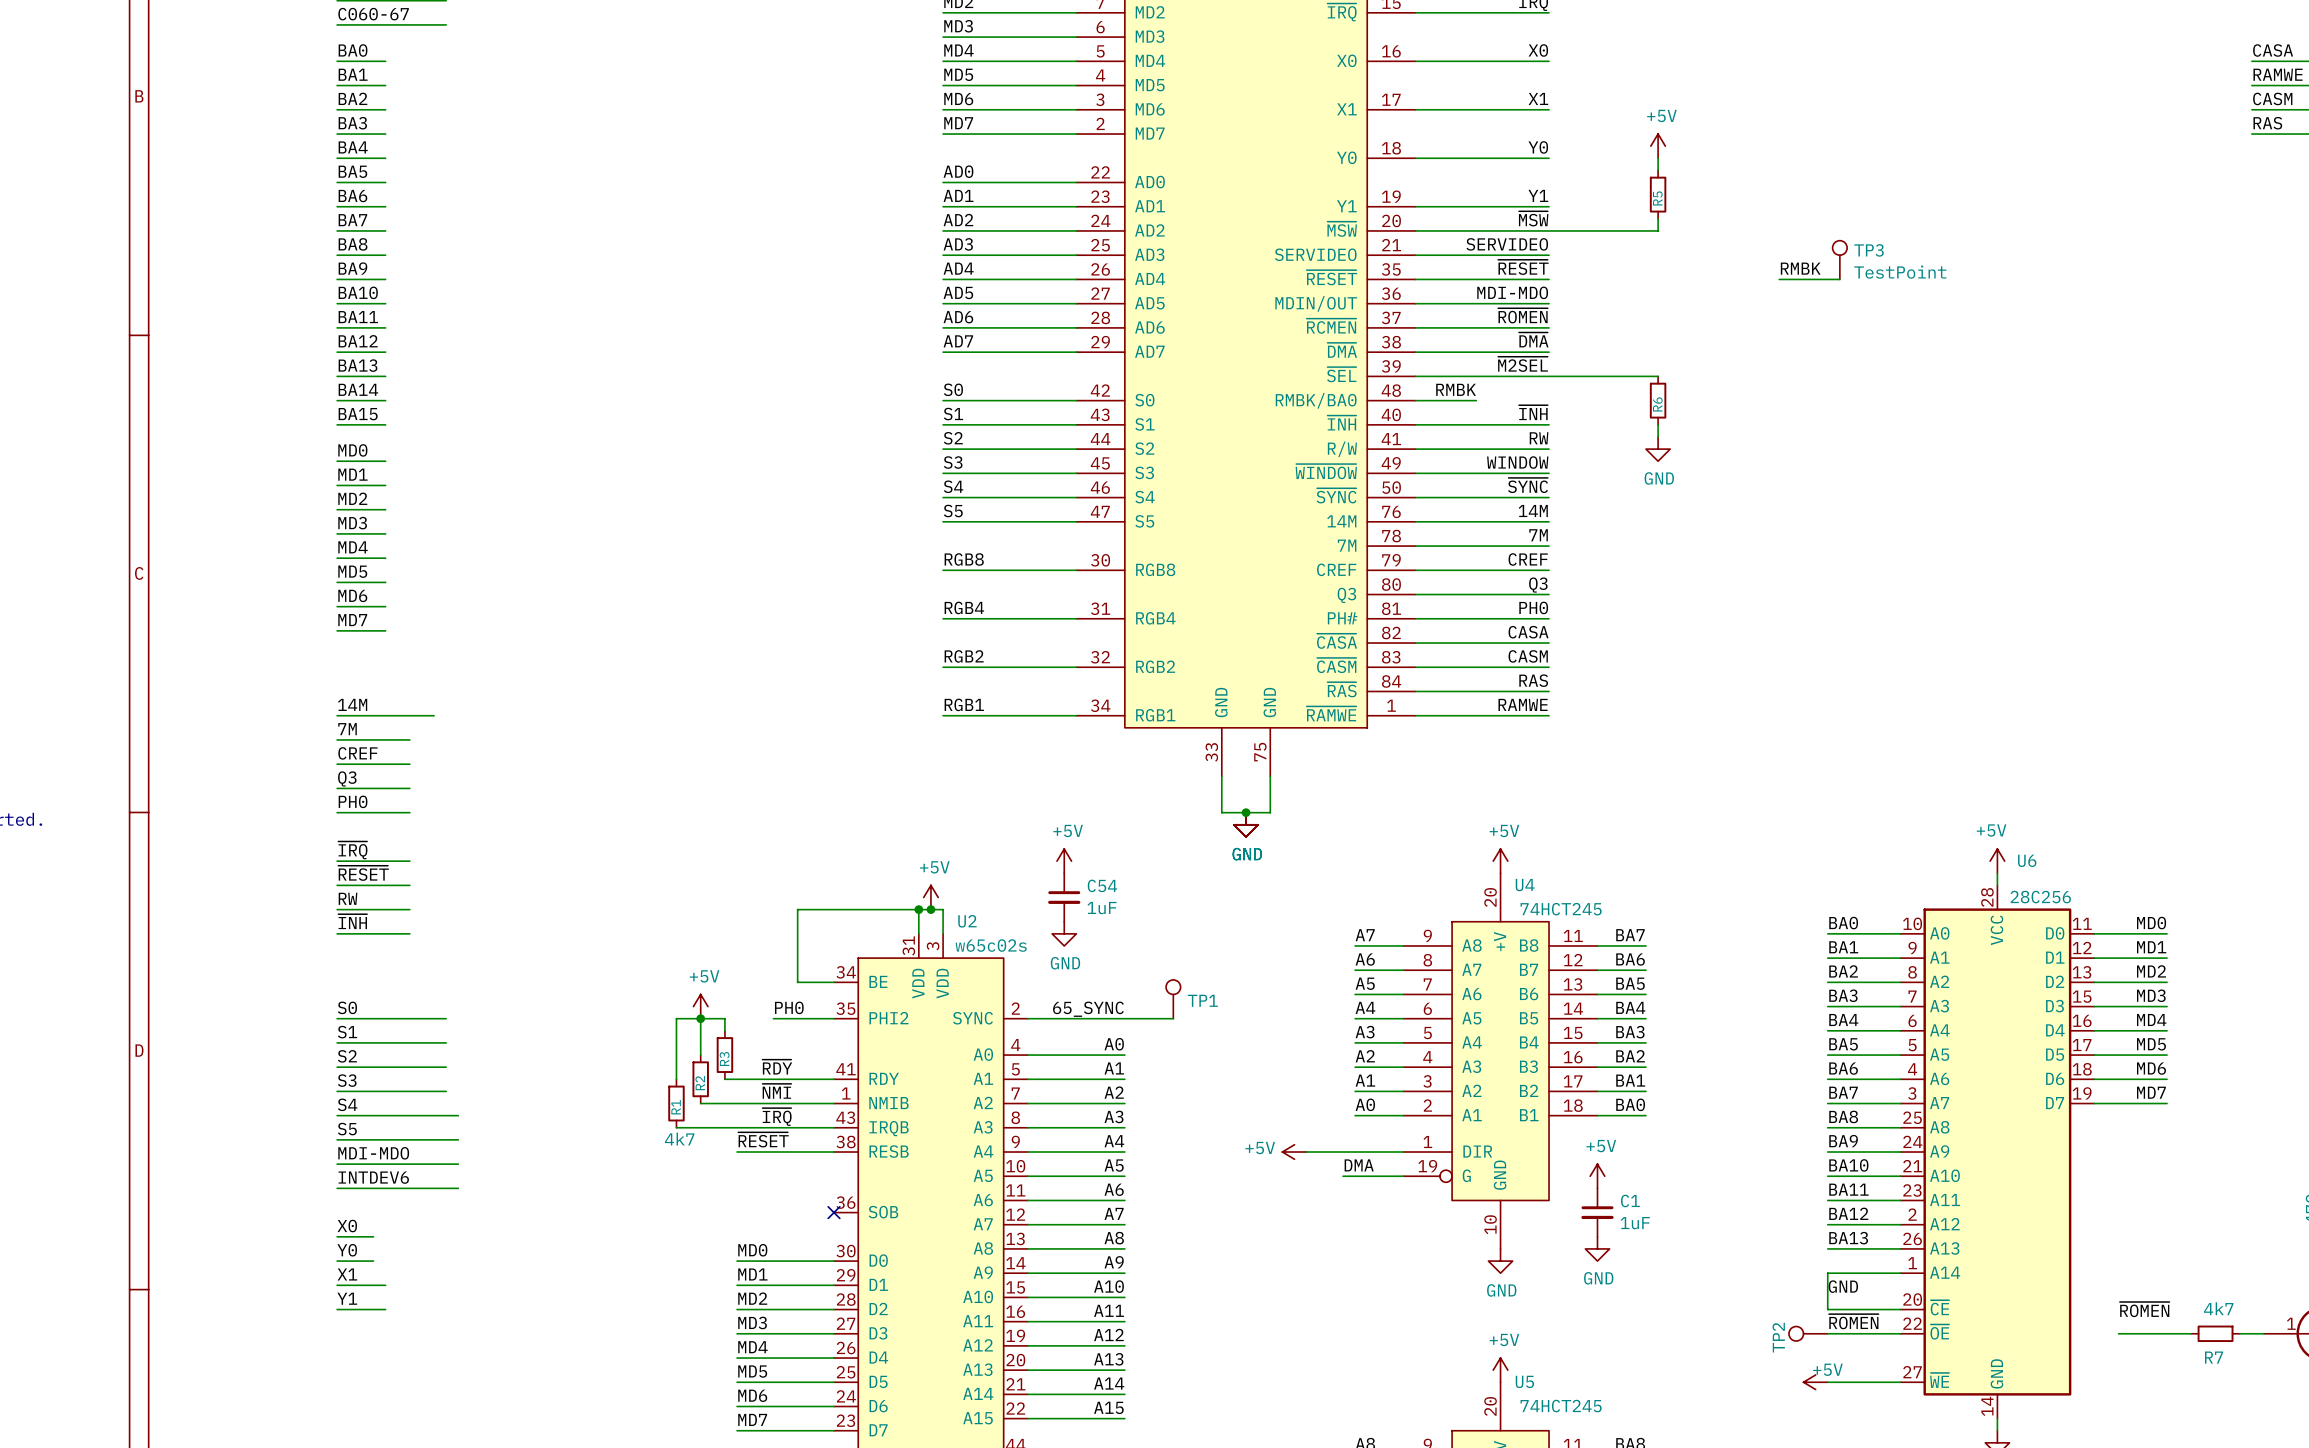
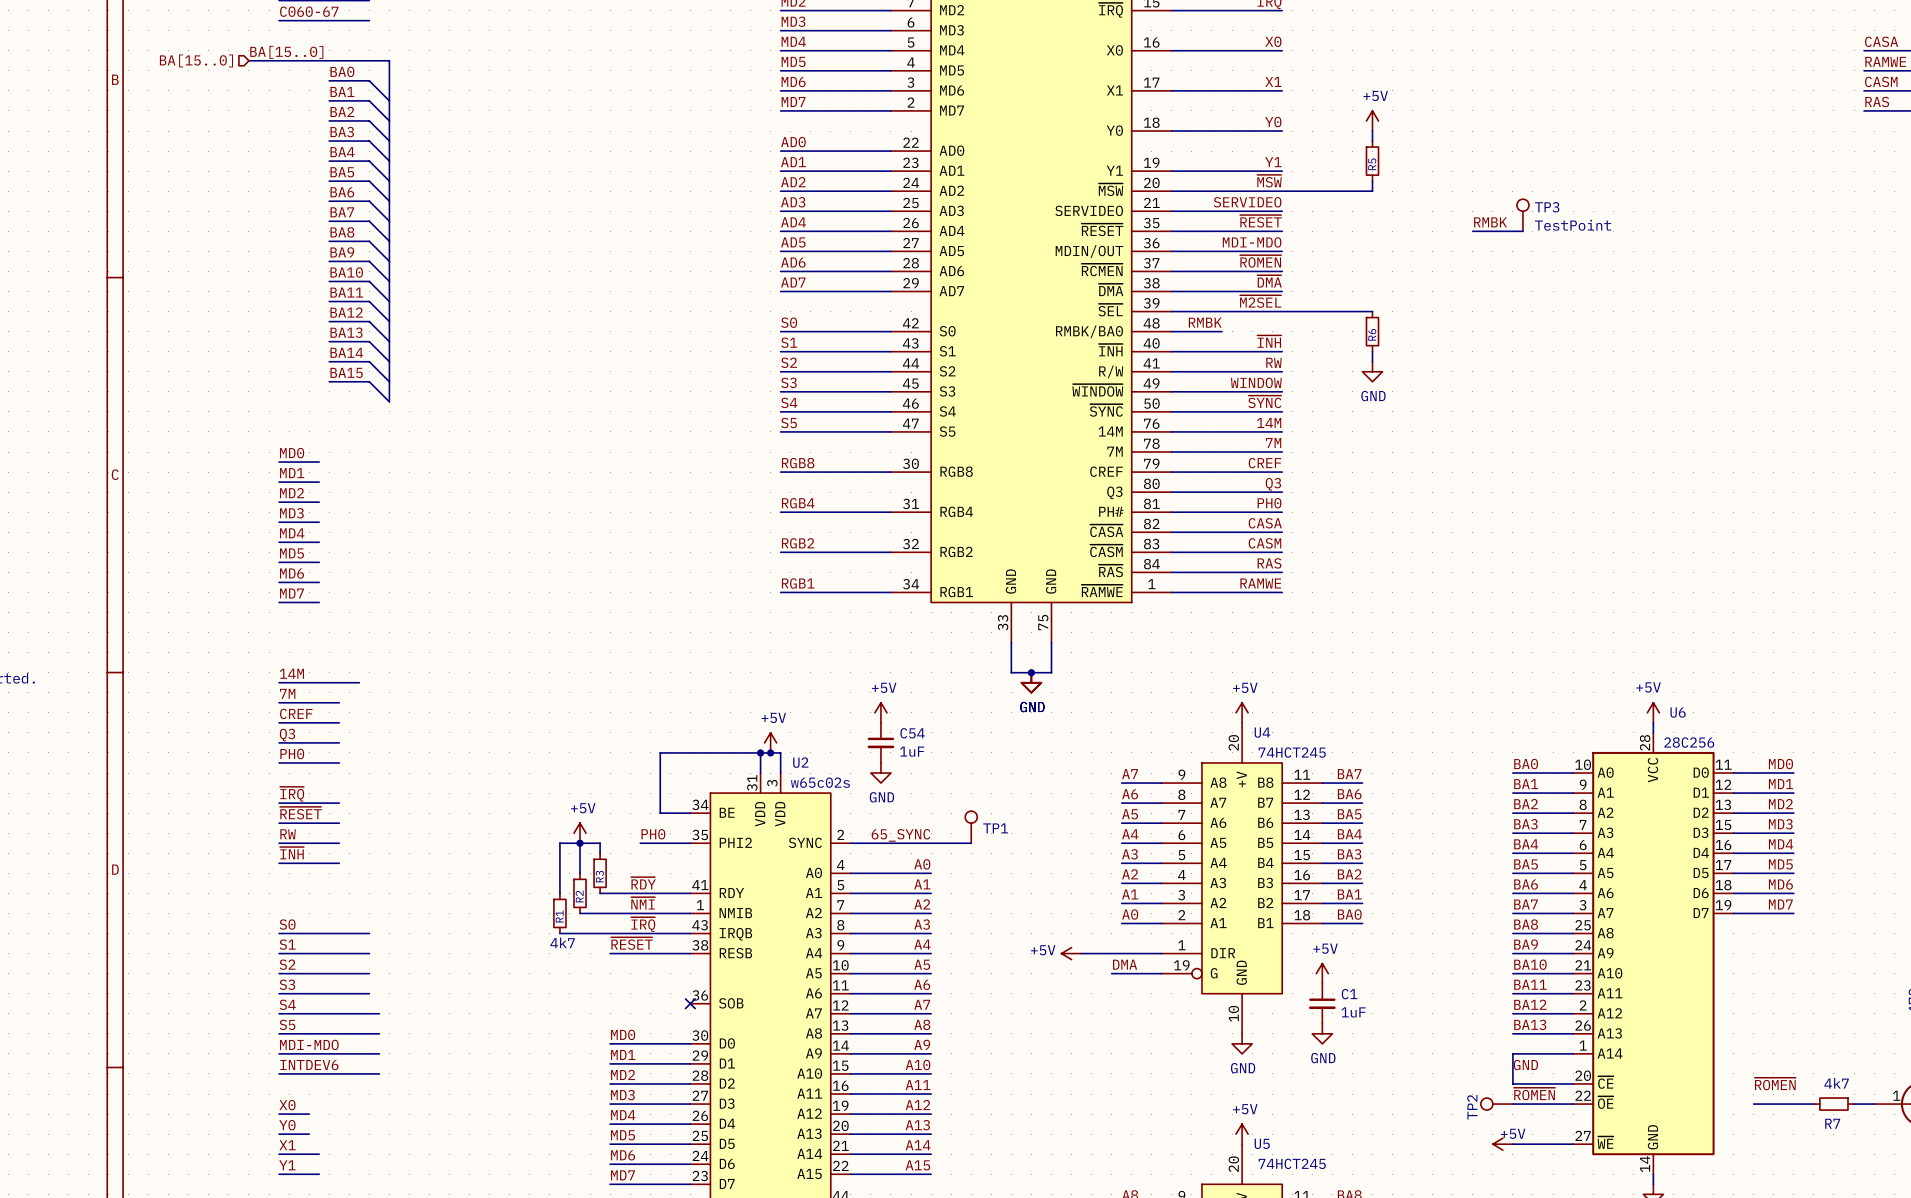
label position: BA0 (353, 50) -> BA0 (342, 71)
wire: (337, 61) (385, 61) -> none
label: none -> BA[15..0] (286, 52)
hierarchical label: none -> BA[15..0] (196, 60)
bus: none -> (248, 60) (389, 60) (389, 401)
label position: BA1 (353, 74) -> BA1 (342, 91)
wire: (337, 85) (385, 85) -> none
wire: none -> (329, 80) (369, 80) (389, 100)
label position: BA2 (352, 98) -> BA2 (342, 111)
wire: (337, 109) (385, 109) -> none
wire: none -> (329, 100) (369, 100) (389, 120)
label position: BA3 (352, 123) -> BA3 (342, 132)
wire: (337, 134) (385, 134) -> none
wire: none -> (329, 120) (369, 120) (389, 141)
label position: BA4 (353, 147) -> BA4 (342, 152)
wire: (337, 158) (385, 158) -> none
wire: none -> (329, 141) (369, 141) (389, 161)
label position: BA5 (352, 171) -> BA5 (342, 172)
wire: (337, 182) (385, 182) -> none
wire: none -> (329, 161) (369, 161) (389, 181)
label position: BA6 (352, 196) -> BA6 (342, 192)
wire: (337, 206) (385, 206) -> none
wire: none -> (329, 181) (369, 181) (389, 201)
label position: BA7 (352, 220) -> BA7 (342, 212)
wire: (337, 230) (385, 230) -> none
wire: none -> (329, 201) (369, 201) (389, 221)
label position: BA8 (353, 244) -> BA8 (342, 232)
wire: (337, 255) (385, 255) -> none
wire: none -> (329, 221) (369, 221) (389, 241)
label position: BA9 (352, 268) -> BA9 (342, 252)
wire: (337, 279) (385, 279) -> none
wire: none -> (329, 241) (369, 241) (389, 261)
label position: BA10 (358, 292) -> BA10 (346, 272)
wire: (337, 303) (385, 303) -> none
wire: none -> (329, 261) (369, 261) (389, 281)
label position: BA11 (358, 317) -> BA11 (346, 292)
wire: (337, 327) (385, 327) -> none
wire: none -> (329, 281) (369, 281) (389, 301)
label position: BA12 (358, 341) -> BA12 (346, 312)
wire: (337, 352) (385, 352) -> none
wire: none -> (329, 301) (369, 301) (389, 321)
label position: BA13 (358, 365) -> BA13 (346, 332)
wire: (337, 376) (385, 376) -> none
wire: none -> (329, 321) (369, 321) (389, 341)
label position: BA14 (358, 389) -> BA14 (346, 352)
wire: (337, 400) (385, 400) -> none
wire: none -> (329, 341) (369, 341) (389, 361)
label position: BA15 (358, 414) -> BA15 (346, 372)
wire: (337, 424) (385, 424) -> none
wire: none -> (329, 361) (369, 361) (389, 381)
label: MD0 (352, 450) -> none
wire: (337, 461) (385, 461) -> (279, 542) (319, 542)
wire: none -> (329, 381) (369, 381) (389, 401)
label: MD1 (352, 474) -> none
wire: (337, 485) (385, 485) -> (279, 562) (319, 562)
label: MD2 (352, 498) -> none
wire: (337, 509) (385, 509) -> (279, 582) (319, 582)
label: MD3 (352, 523) -> none
wire: (337, 533) (385, 533) -> (279, 602) (319, 602)
label: MD4 (353, 547) -> MD0 (292, 453)
label: MD5 (352, 571) -> MD1 (292, 473)
label: MD6 (352, 595) -> MD2 (292, 493)
label: MD7 (352, 620) -> MD3 (291, 513)
label: none -> MD4 (292, 533)
label: none -> MD5 (292, 553)
label: none -> MD6 (292, 573)
label position: 14M (352, 704) -> 14M (291, 673)
wire: (337, 715) (434, 715) -> (279, 682) (359, 682)
label: none -> MD7 (291, 593)
label position: 7M (347, 729) -> 7M (287, 693)
wire: (337, 739) (409, 739) -> (279, 702) (339, 702)
label position: CREF (357, 753) -> CREF (296, 713)
wire: (337, 764) (409, 764) -> (279, 722) (339, 722)
label position: Q3 (347, 778) -> Q3 (287, 735)
wire: (337, 788) (409, 788) -> (279, 742) (339, 742)
label position: PH0 (353, 801) -> PH0 (292, 754)
wire: (337, 812) (409, 812) -> (279, 762) (339, 762)
label position: ~{IRQ} (352, 850) -> ~{IRQ} (292, 794)
wire: (337, 861) (409, 861) -> (279, 803) (339, 803)
label position: ~{RESET} (363, 873) -> ~{RESET} (300, 813)
wire: (337, 885) (409, 885) -> (279, 823) (339, 823)
label: RW (348, 898) -> none
wire: (337, 909) (409, 909) -> none
label: ~{INH} (352, 921) -> none
wire: (337, 933) (409, 933) -> none
label: S0 (347, 1007) -> RW (288, 834)
wire: (409, 1018) (446, 1018) -> none
label: S1 (347, 1032) -> ~{INH} (292, 853)
wire: (409, 1042) (446, 1042) -> none
label position: S2 (347, 1056) -> S2 (287, 964)
wire: (337, 1067) (446, 1067) -> (279, 973) (369, 973)
label position: S3 (347, 1080) -> S3 (287, 984)
wire: (337, 1091) (446, 1091) -> (279, 993) (369, 993)
label position: S4 (347, 1104) -> S4 (287, 1004)
wire: (337, 1115) (458, 1115) -> (279, 1013) (379, 1013)
label: none -> S0 (287, 924)
wire: none -> (279, 933) (369, 933)
label position: S5 (347, 1129) -> S5 (287, 1024)
wire: (337, 1139) (458, 1139) -> (279, 1033) (379, 1033)
label: none -> S1 (287, 944)
wire: none -> (279, 953) (369, 953)
label position: MDI-MDO (373, 1153) -> MDI-MDO (309, 1044)
wire: (337, 1164) (458, 1164) -> (279, 1053) (379, 1053)
label position: INTDEV6 (373, 1177) -> INTDEV6 (309, 1065)
wire: (337, 1188) (458, 1188) -> (279, 1073) (379, 1073)
label position: X0 (347, 1226) -> X0 (287, 1105)
wire: (337, 1236) (373, 1236) -> (279, 1114) (309, 1114)
label position: Y0 (347, 1250) -> Y0 (287, 1125)
wire: (337, 1261) (373, 1261) -> (279, 1134) (309, 1134)
label position: X1 (347, 1274) -> X1 (287, 1145)
wire: (337, 1285) (385, 1285) -> (279, 1154) (319, 1154)
label position: Y1 (347, 1298) -> Y1 (287, 1165)
wire: (337, 1309) (385, 1309) -> (279, 1174) (319, 1174)

